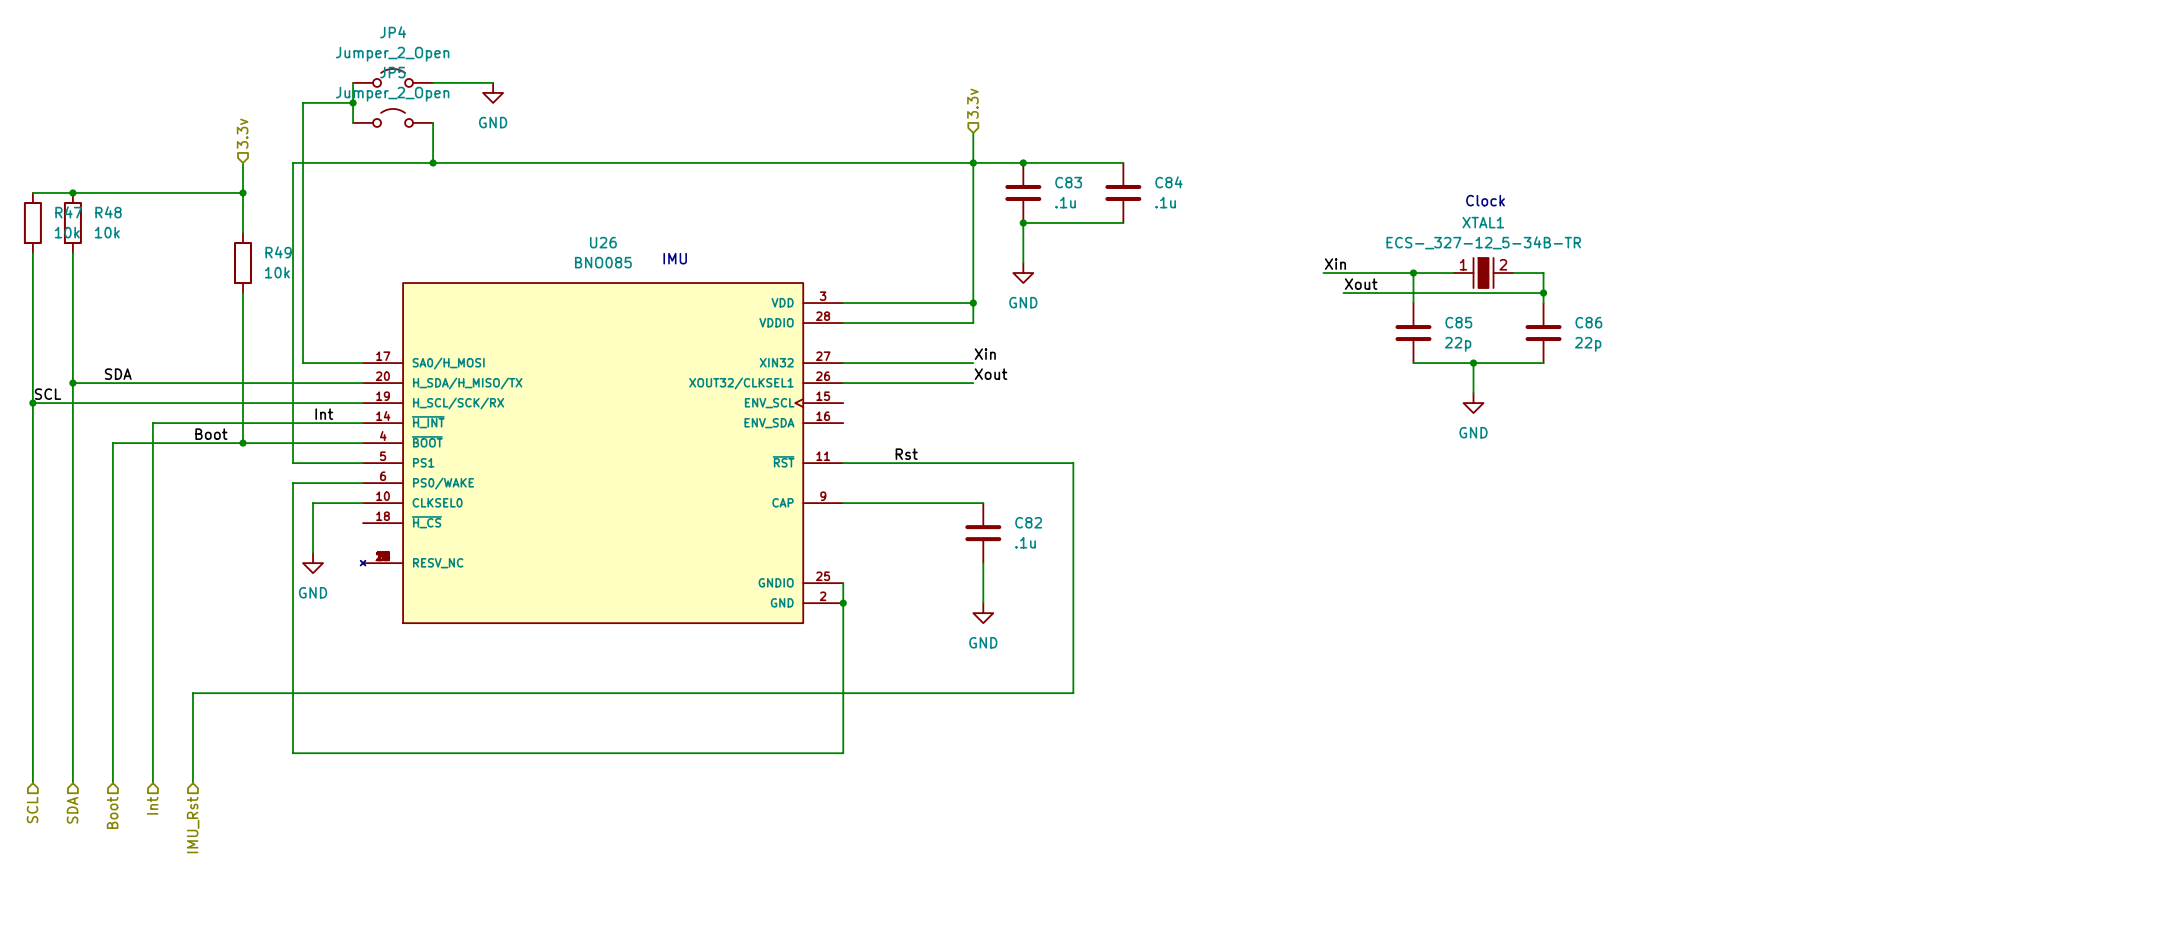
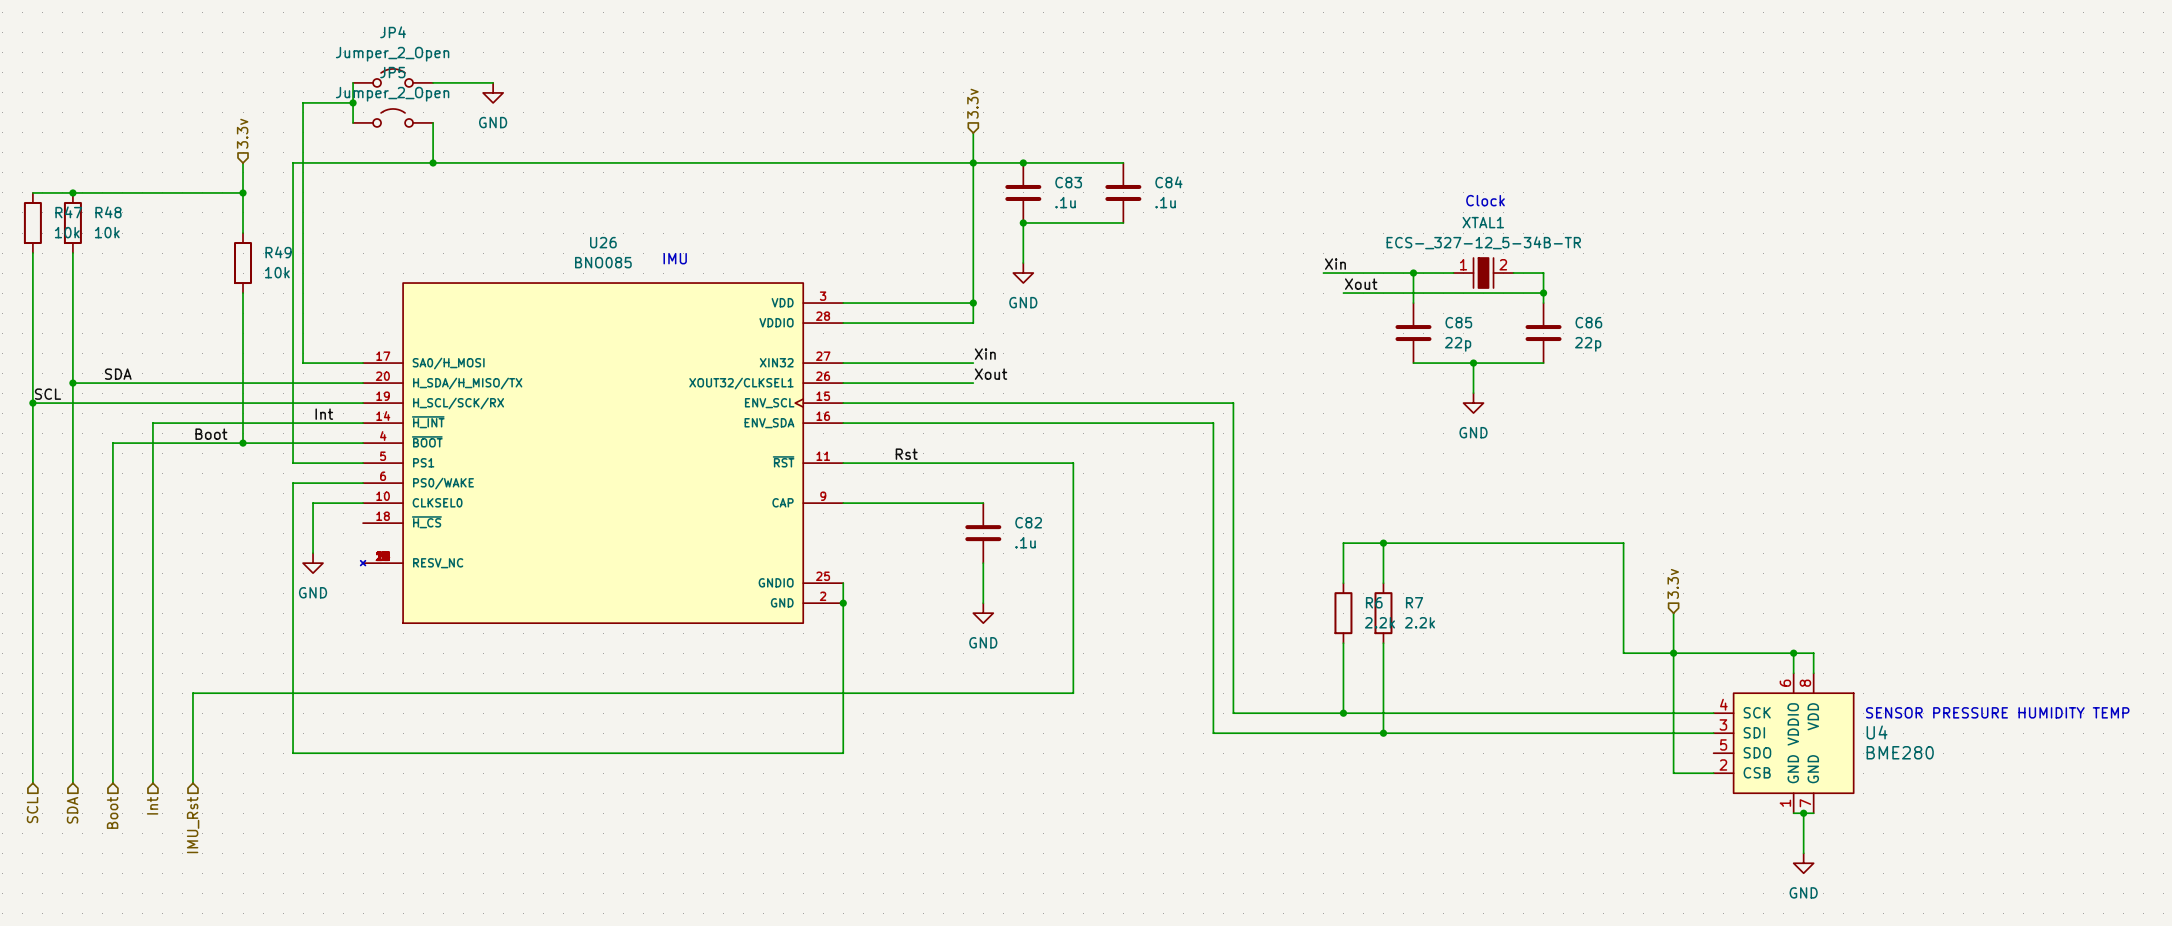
wire: none -> (843, 403) (1233, 403) (1233, 713) (1713, 713)
wire: none -> (843, 423) (1213, 423) (1213, 733) (1713, 733)
wire: none -> (1383, 543) (1383, 583)
junction: none -> (1383, 543)
wire: none -> (1343, 583) (1343, 543) (1623, 543) (1623, 653) (1813, 653) (1813, 673)
hierarchical label: none -> 3.3v (1673, 583)
R6: none -> 2.2k (1343, 613)
R7: none -> 2.2k (1383, 613)
wire: none -> (1673, 613) (1673, 773) (1713, 773)
wire: none -> (1343, 643) (1343, 713)
wire: none -> (1383, 643) (1383, 733)
junction: none -> (1673, 653)
wire: none -> (1793, 653) (1793, 673)
junction: none -> (1793, 653)
text: none -> SENSOR PRESSURE HUMIDITY TEMP (1997, 712)
junction: none -> (1343, 713)
junction: none -> (1383, 733)
U4: none -> BME280 (1783, 743)
wire: none -> (1793, 813) (1813, 813)
wire: none -> (1803, 813) (1803, 853)
junction: none -> (1803, 813)
power symbol: none -> GND (1803, 863)

